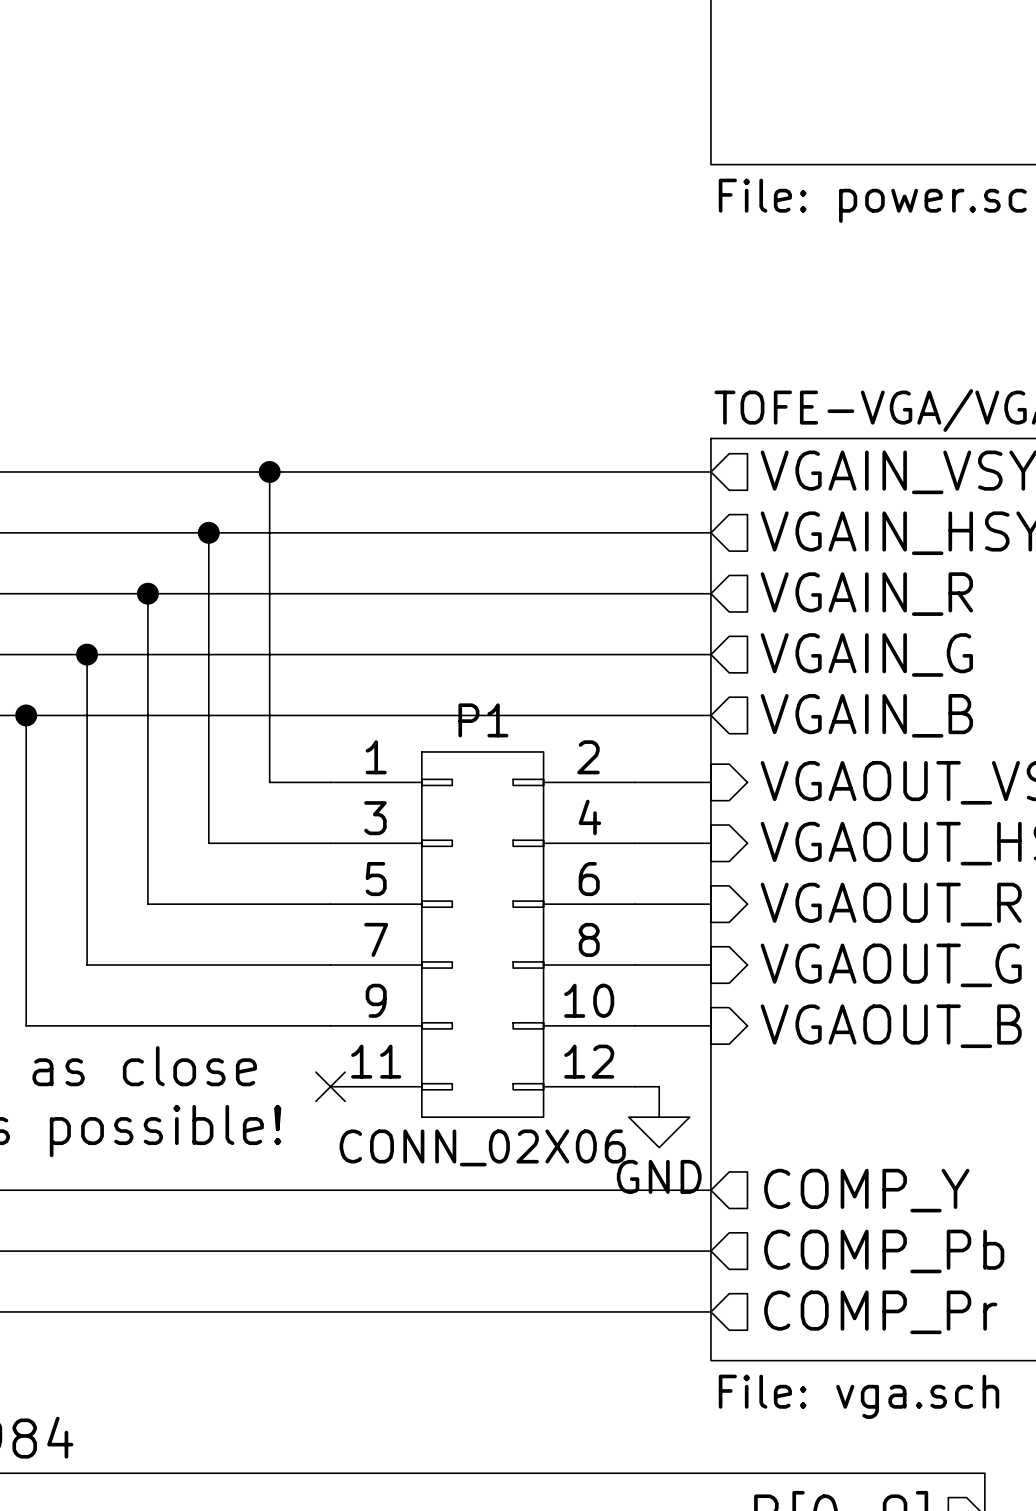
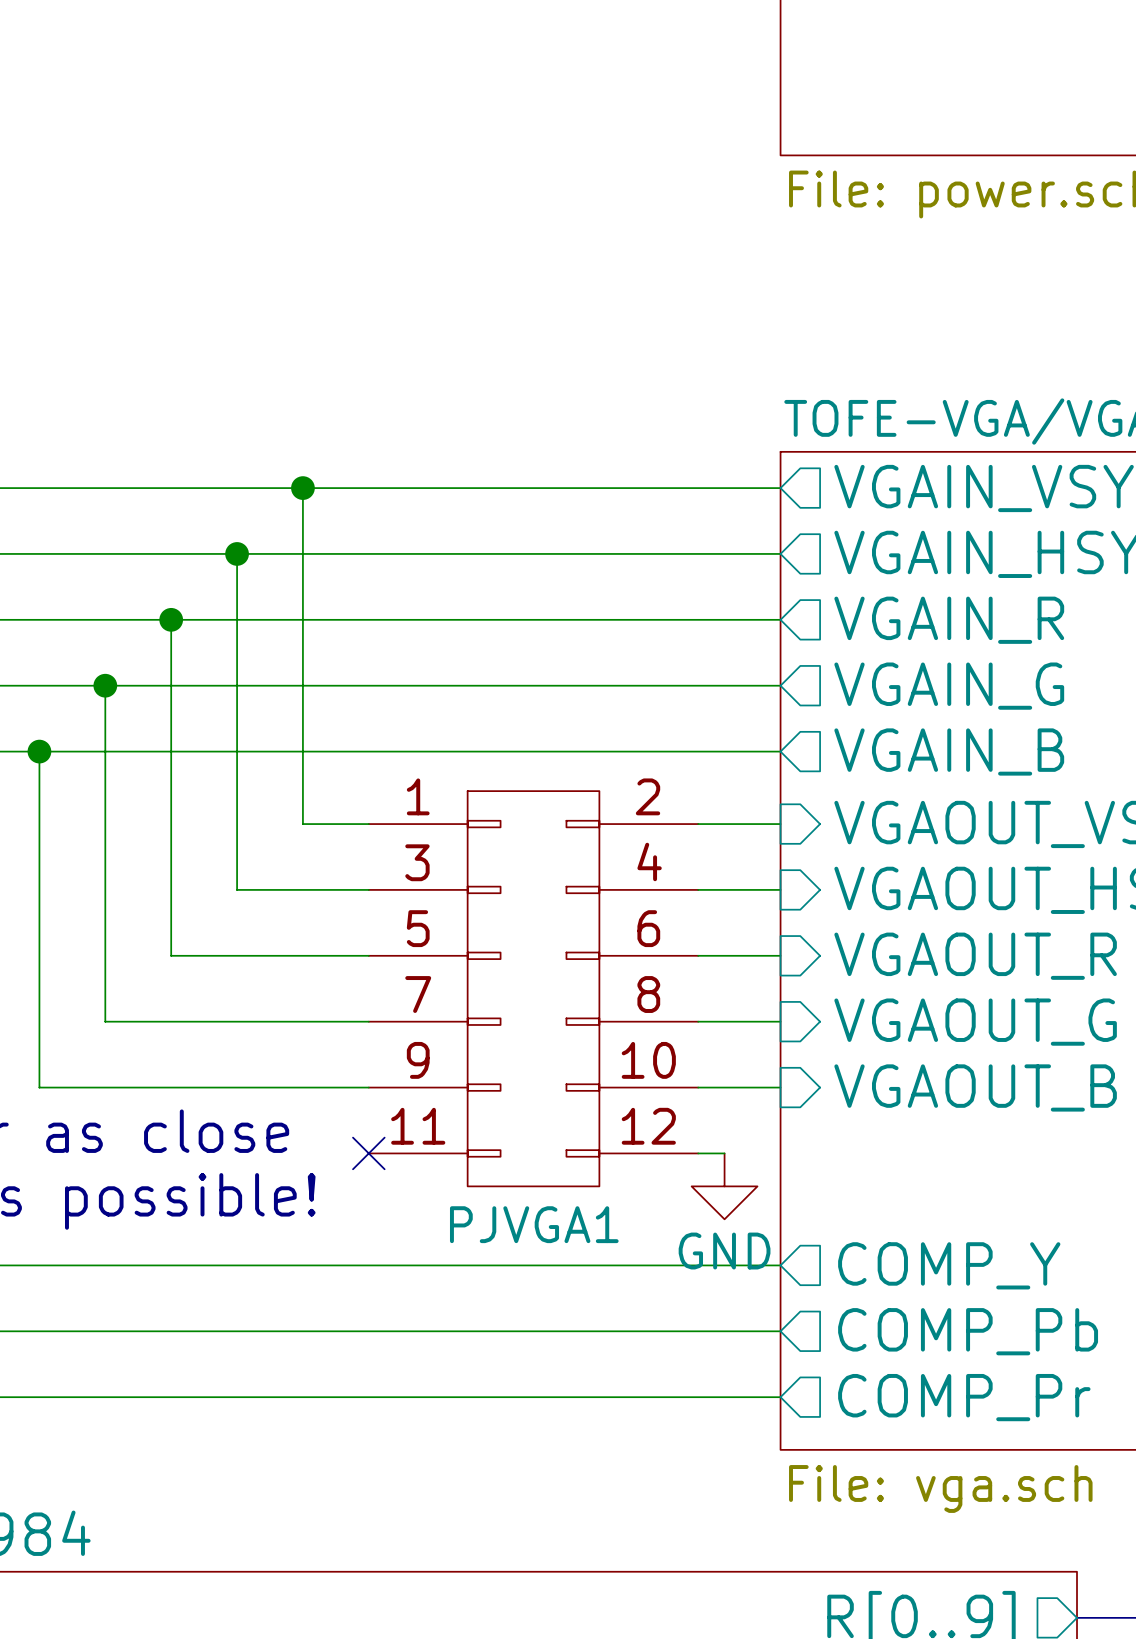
P1 name: P1 (483, 720) -> PJVGA1 (534, 1224)
P1 value: CONN_02X06 (482, 1147) -> none

